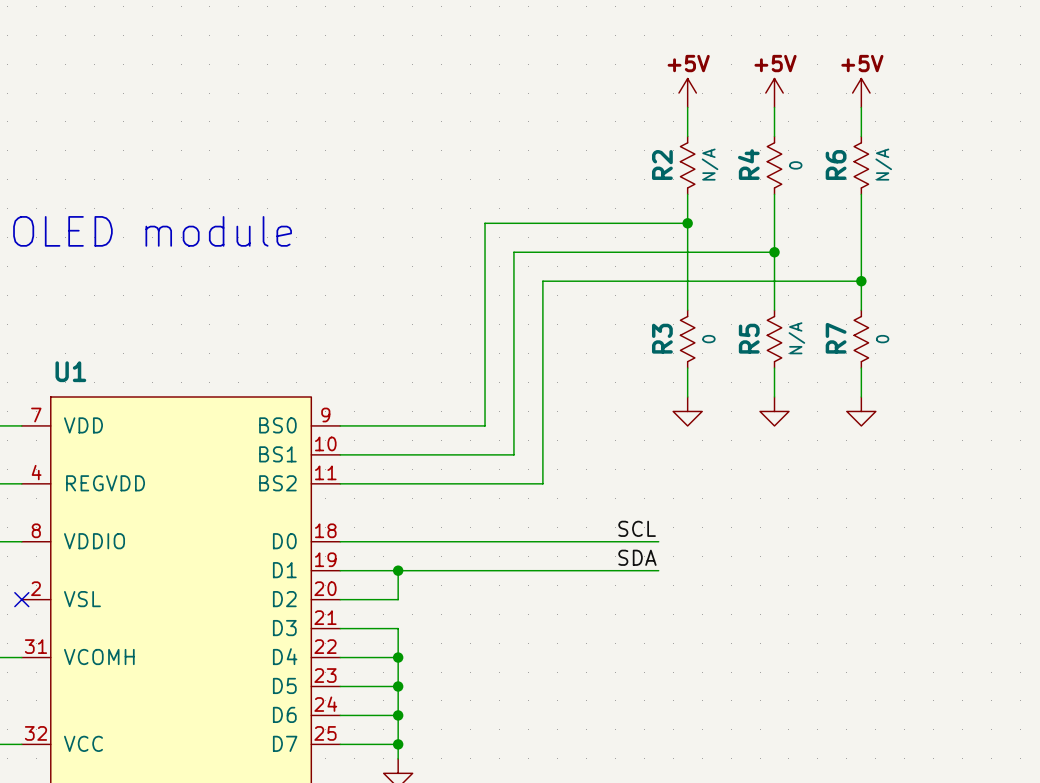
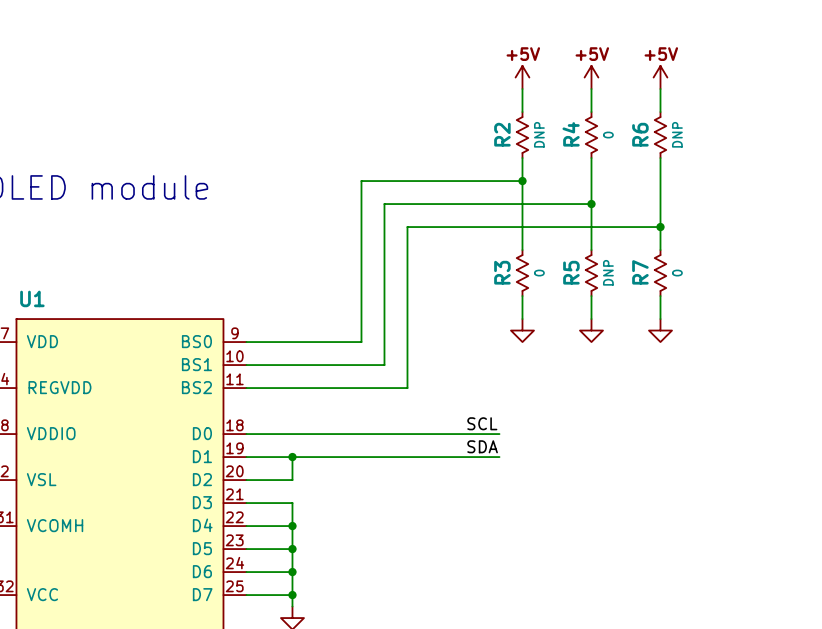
R2 value: N/A (710, 164) -> DNP (539, 134)
R6 value: N/A (883, 164) -> DNP (677, 134)
R5 value: N/A (796, 338) -> DNP (608, 272)

